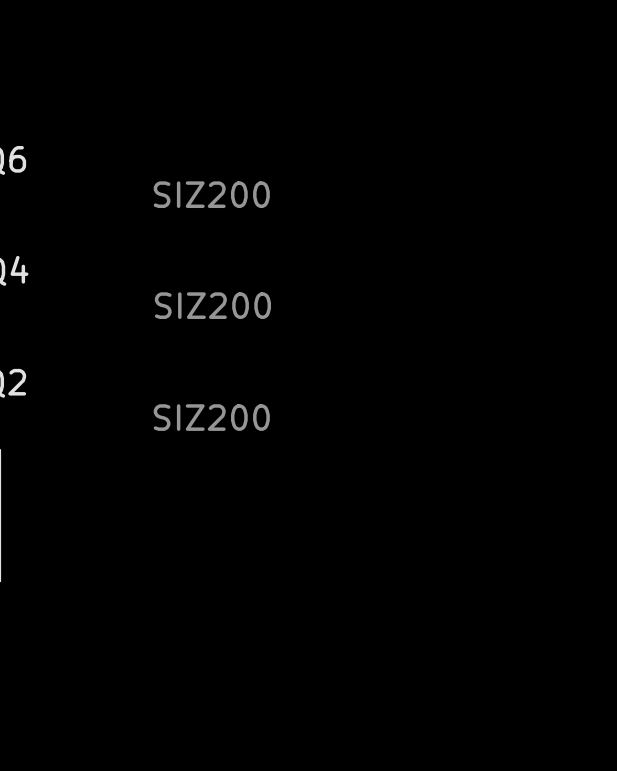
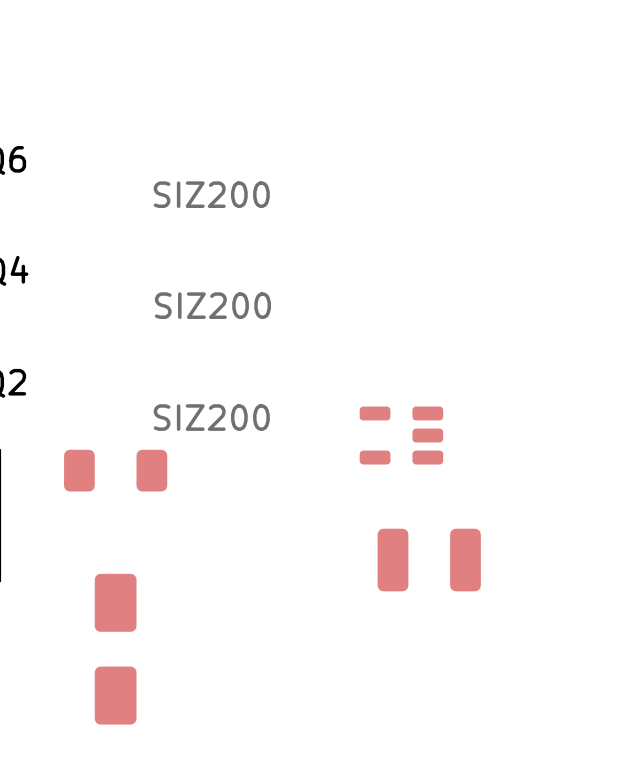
part: none -> (401, 435)
part: none -> (115, 470)
part: none -> (429, 560)
part: none -> (115, 649)

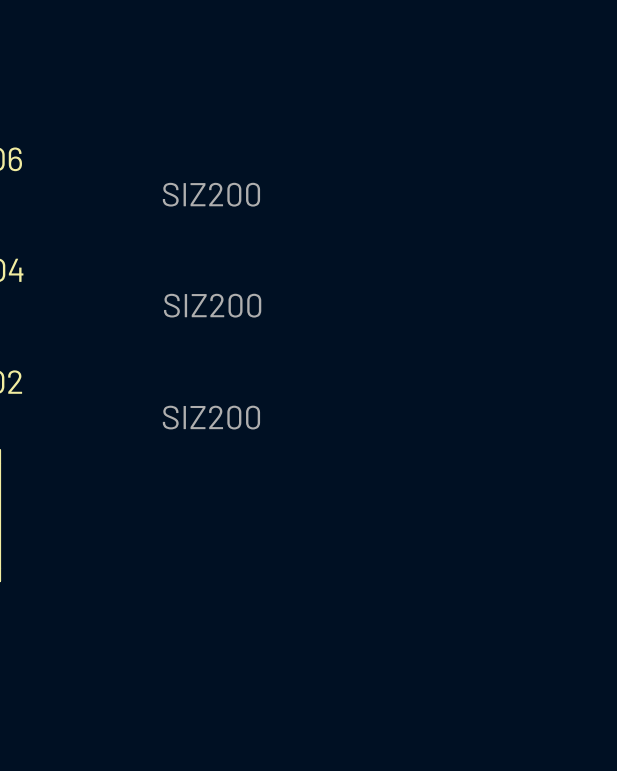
part: (401, 435) -> none
part: (115, 470) -> none
part: (429, 560) -> none
part: (115, 649) -> none

